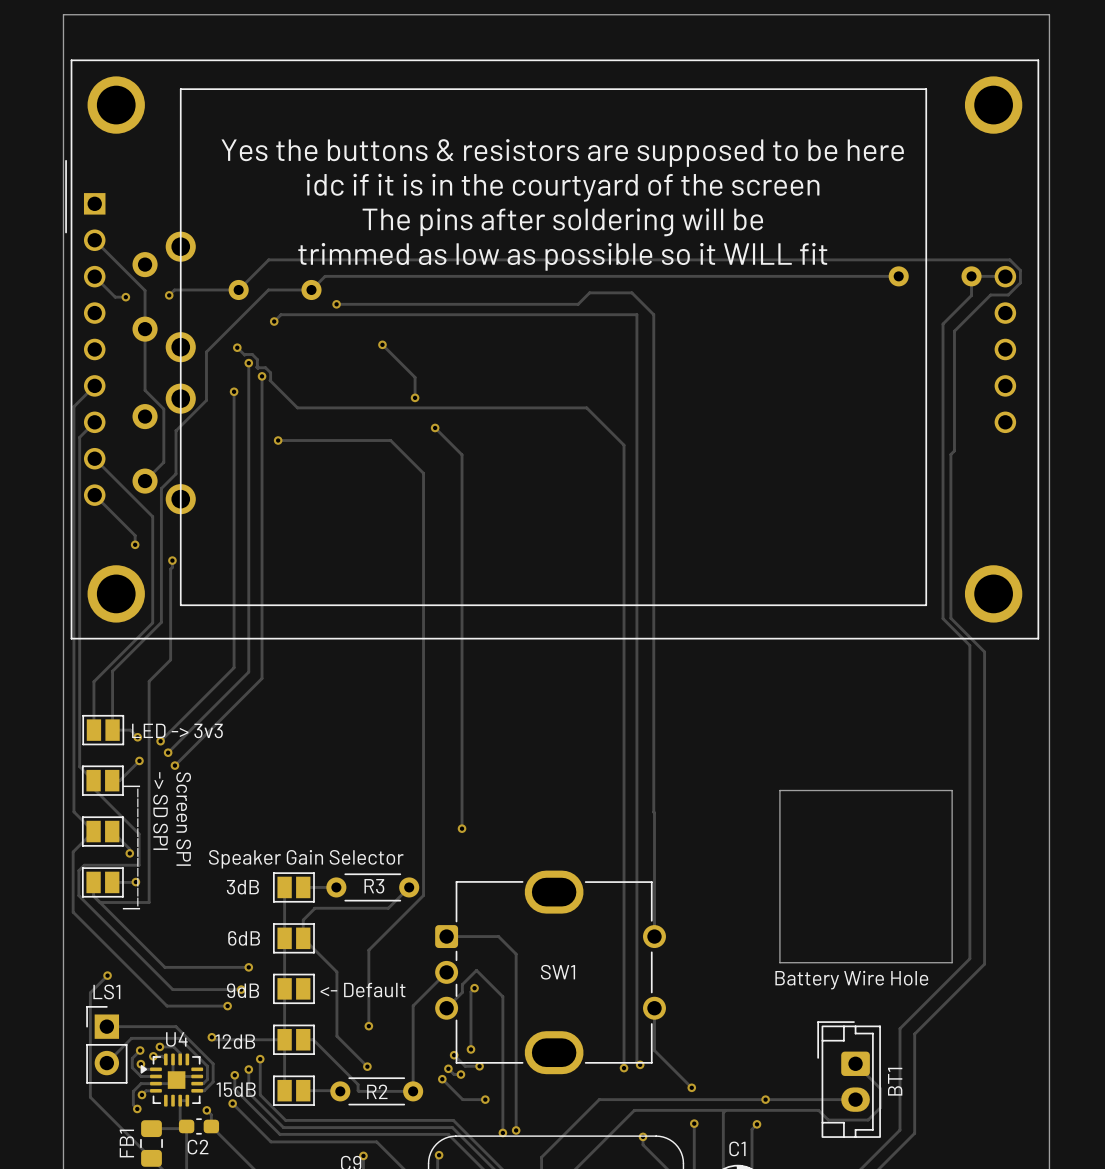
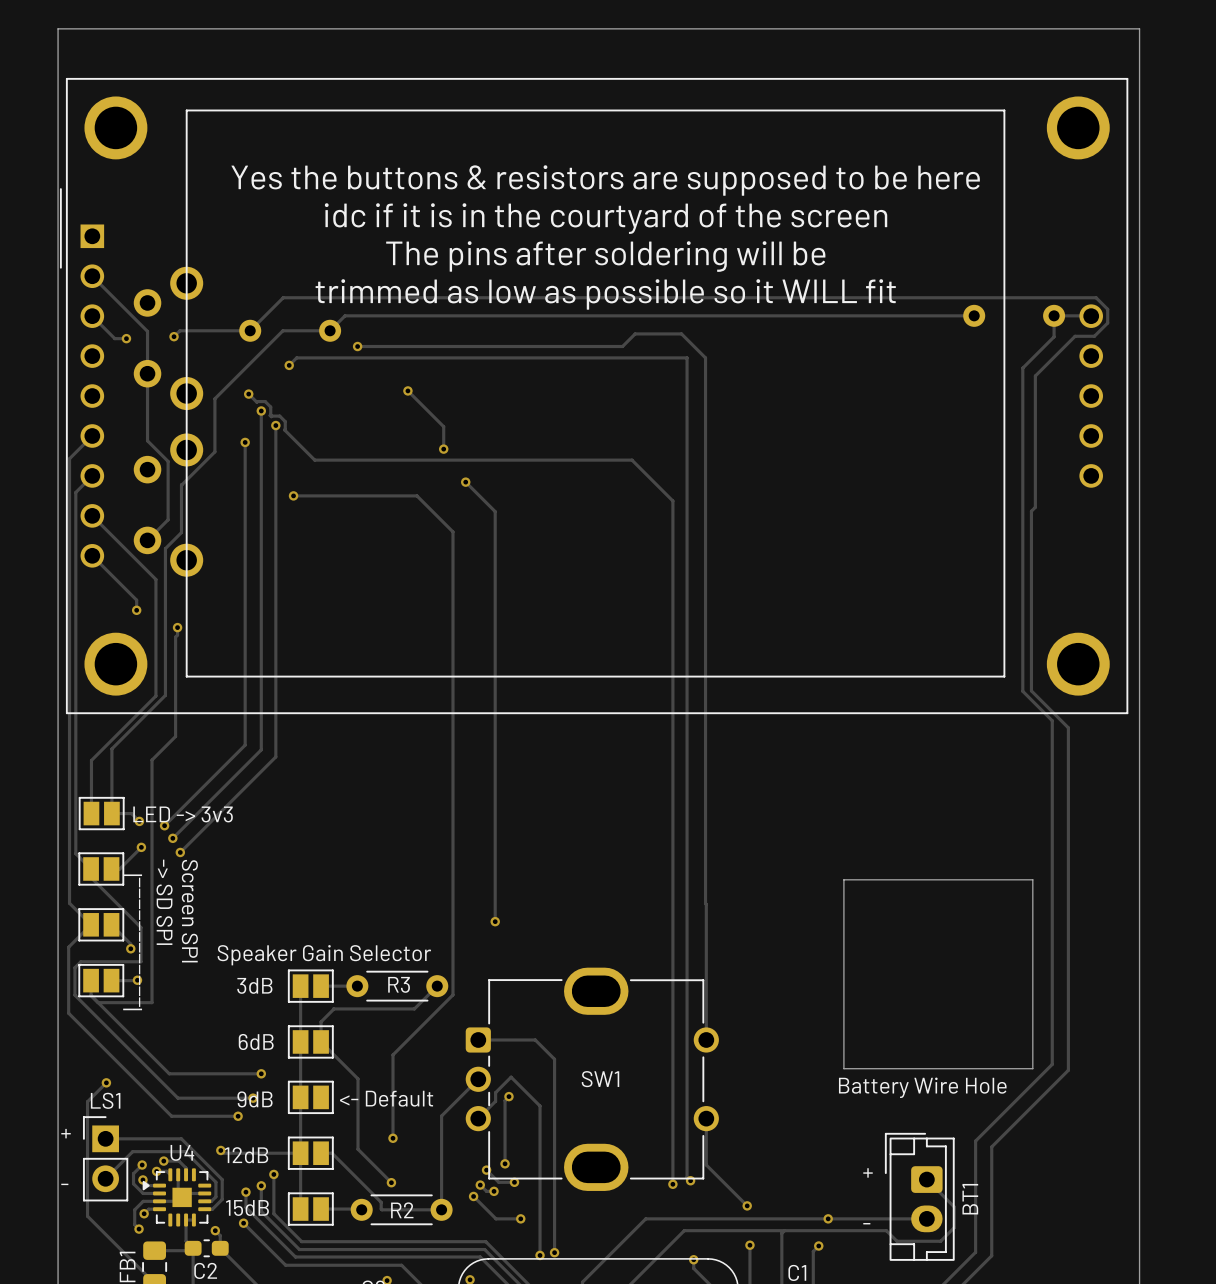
text: none -> + (66, 1133)
text: none -> + (868, 1172)
text: none -> - (64, 1184)
text: none -> - (866, 1223)

